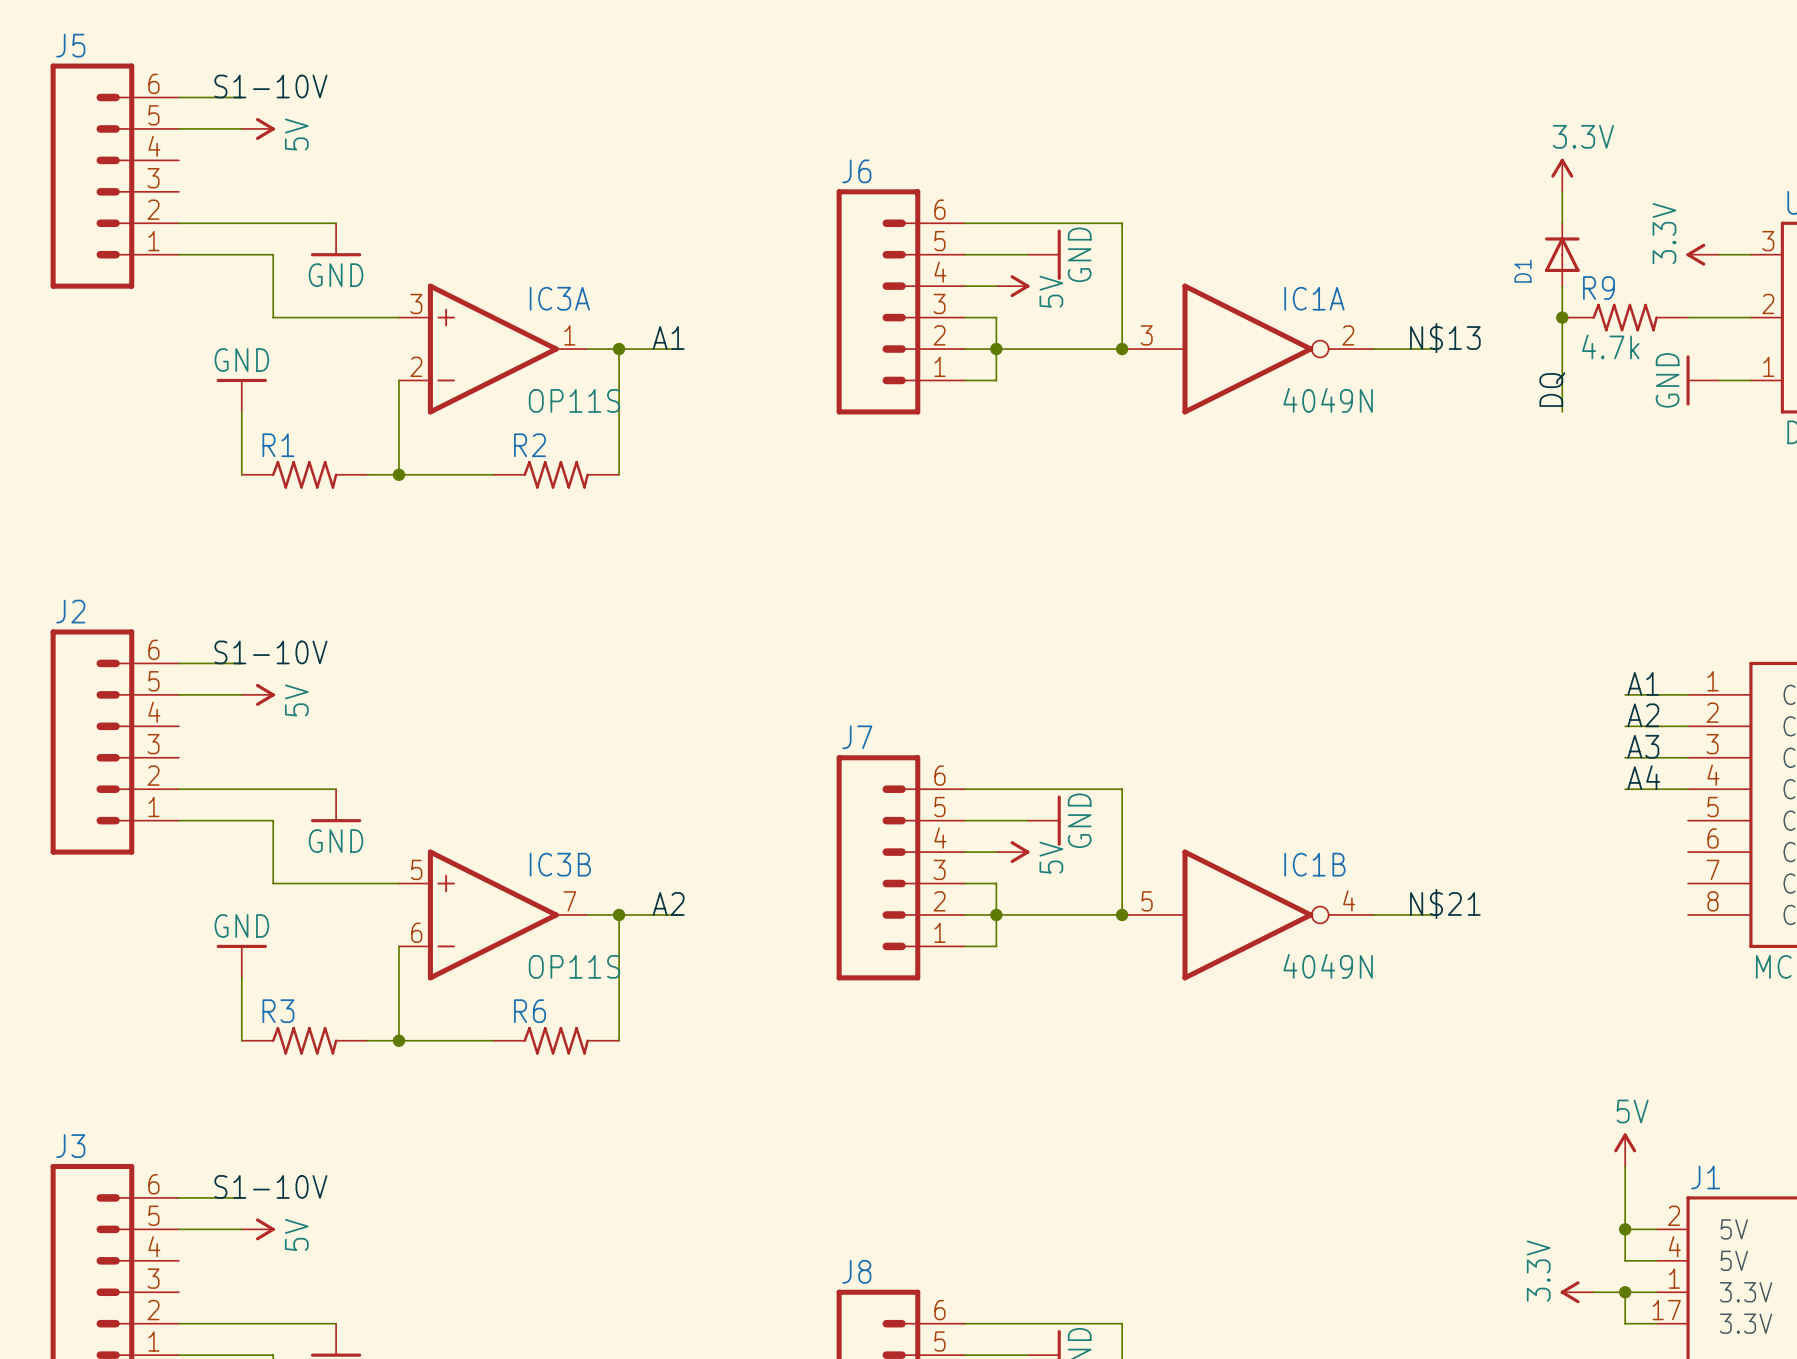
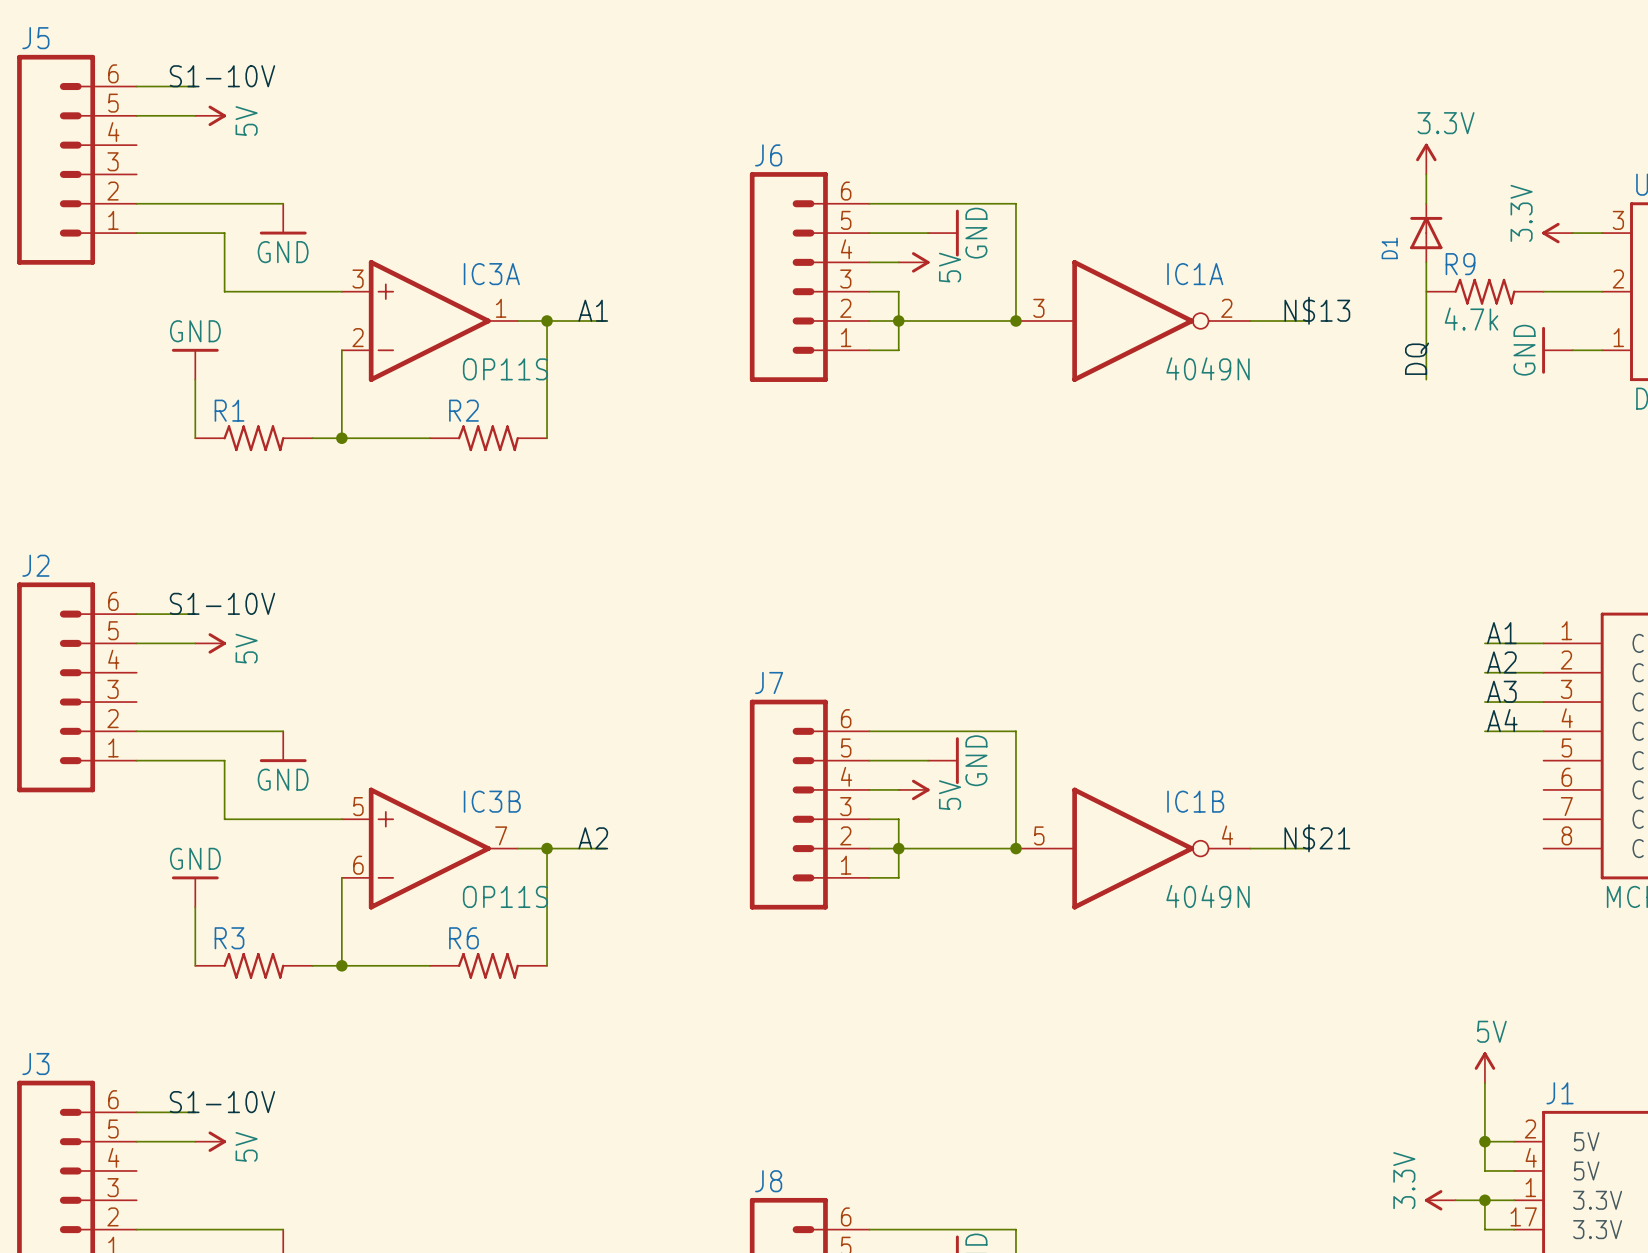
junction: (1562, 317) -> none

